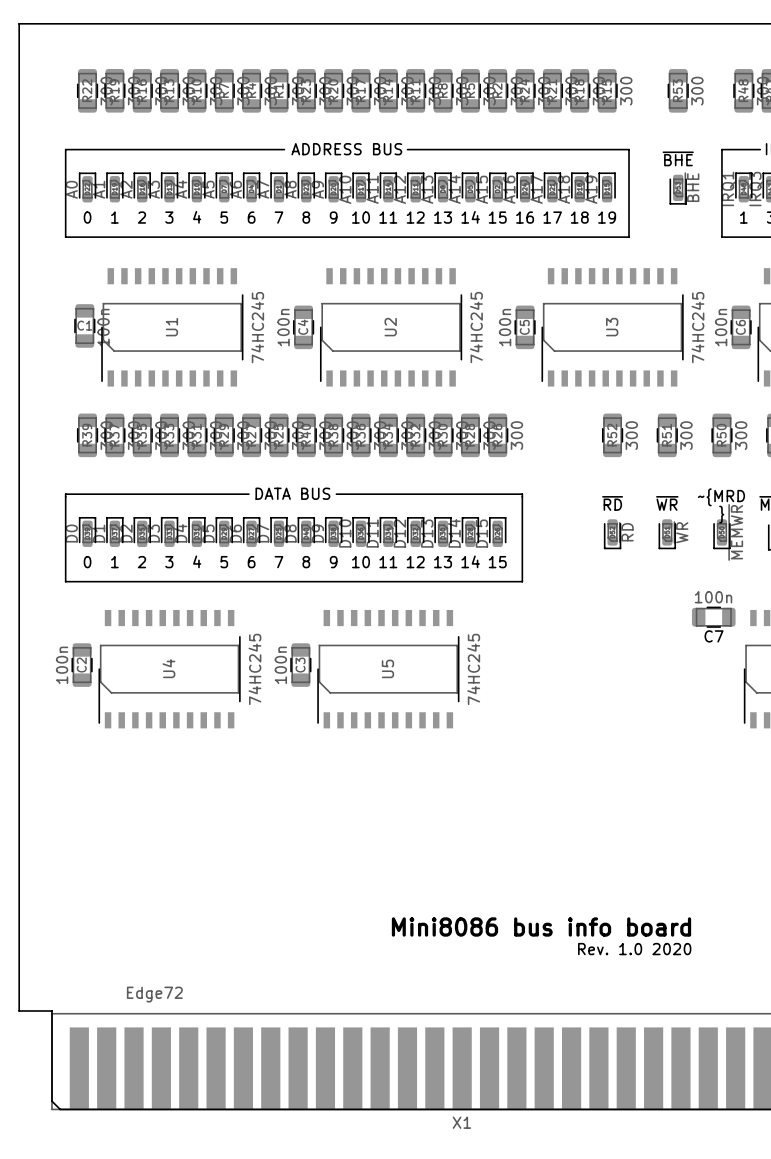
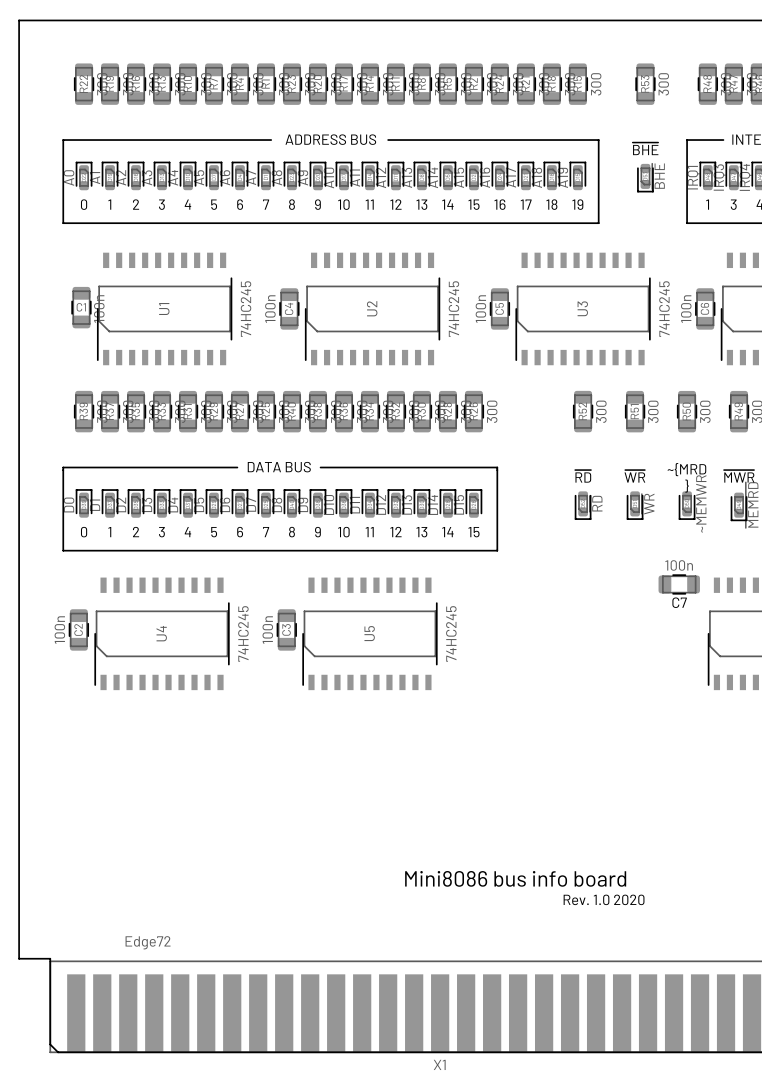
part value: ~{MEMWR} (735, 532) -> ~MEMWR (701, 503)

